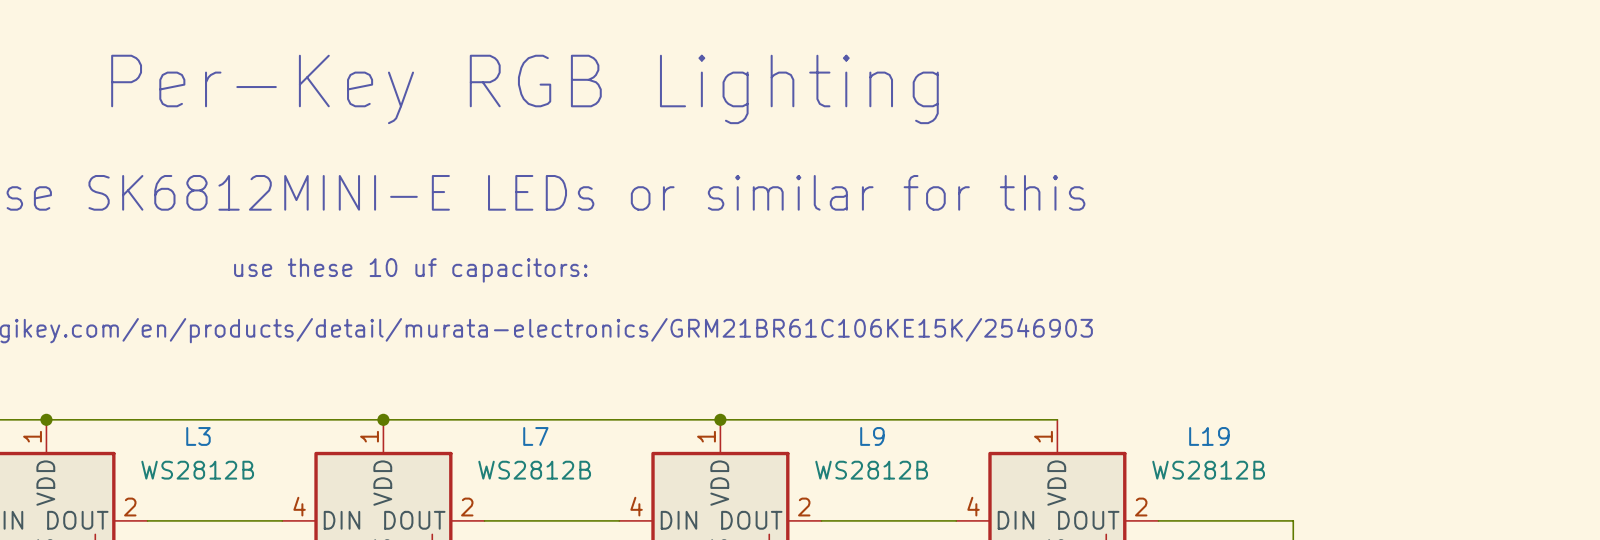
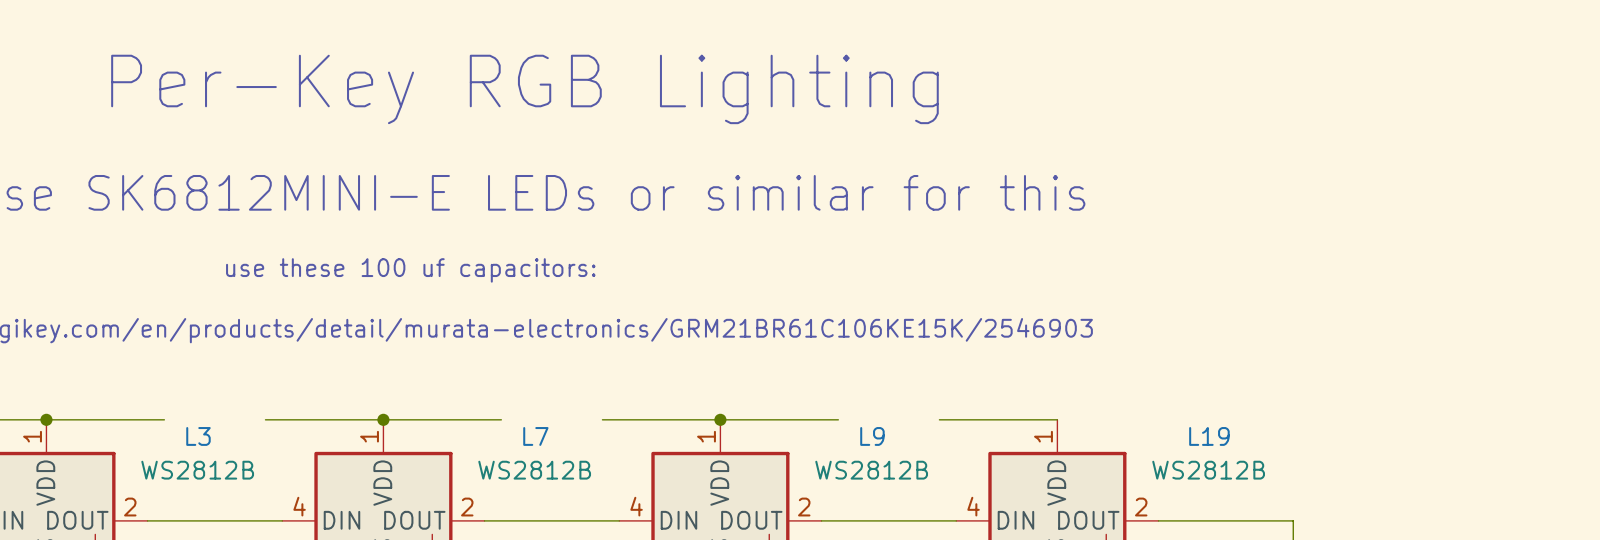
text: use these 10 uf capacitors: (410, 270) -> use these 100 uf capacitors: (410, 270)
wire: (164, 419) (265, 419) -> none
wire: (501, 419) (602, 419) -> none
wire: (838, 419) (939, 419) -> none

